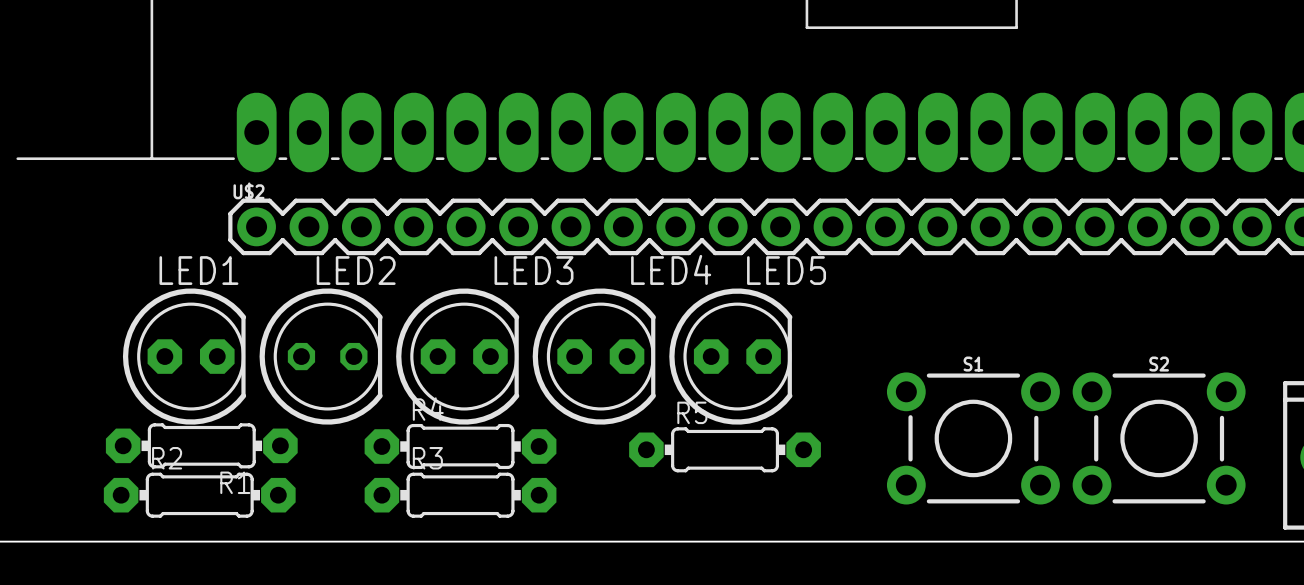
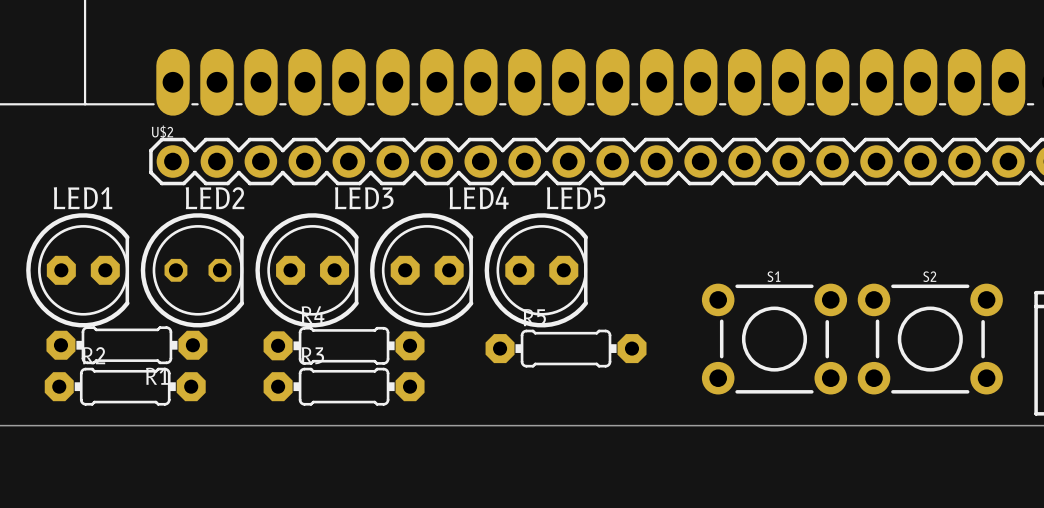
LED1 position: (184, 356) -> (77, 270)
LED2 position: (321, 356) -> (192, 270)
LED3 position: (457, 356) -> (307, 270)
LED4 position: (594, 356) -> (421, 270)
LED5 position: (730, 356) -> (536, 270)

